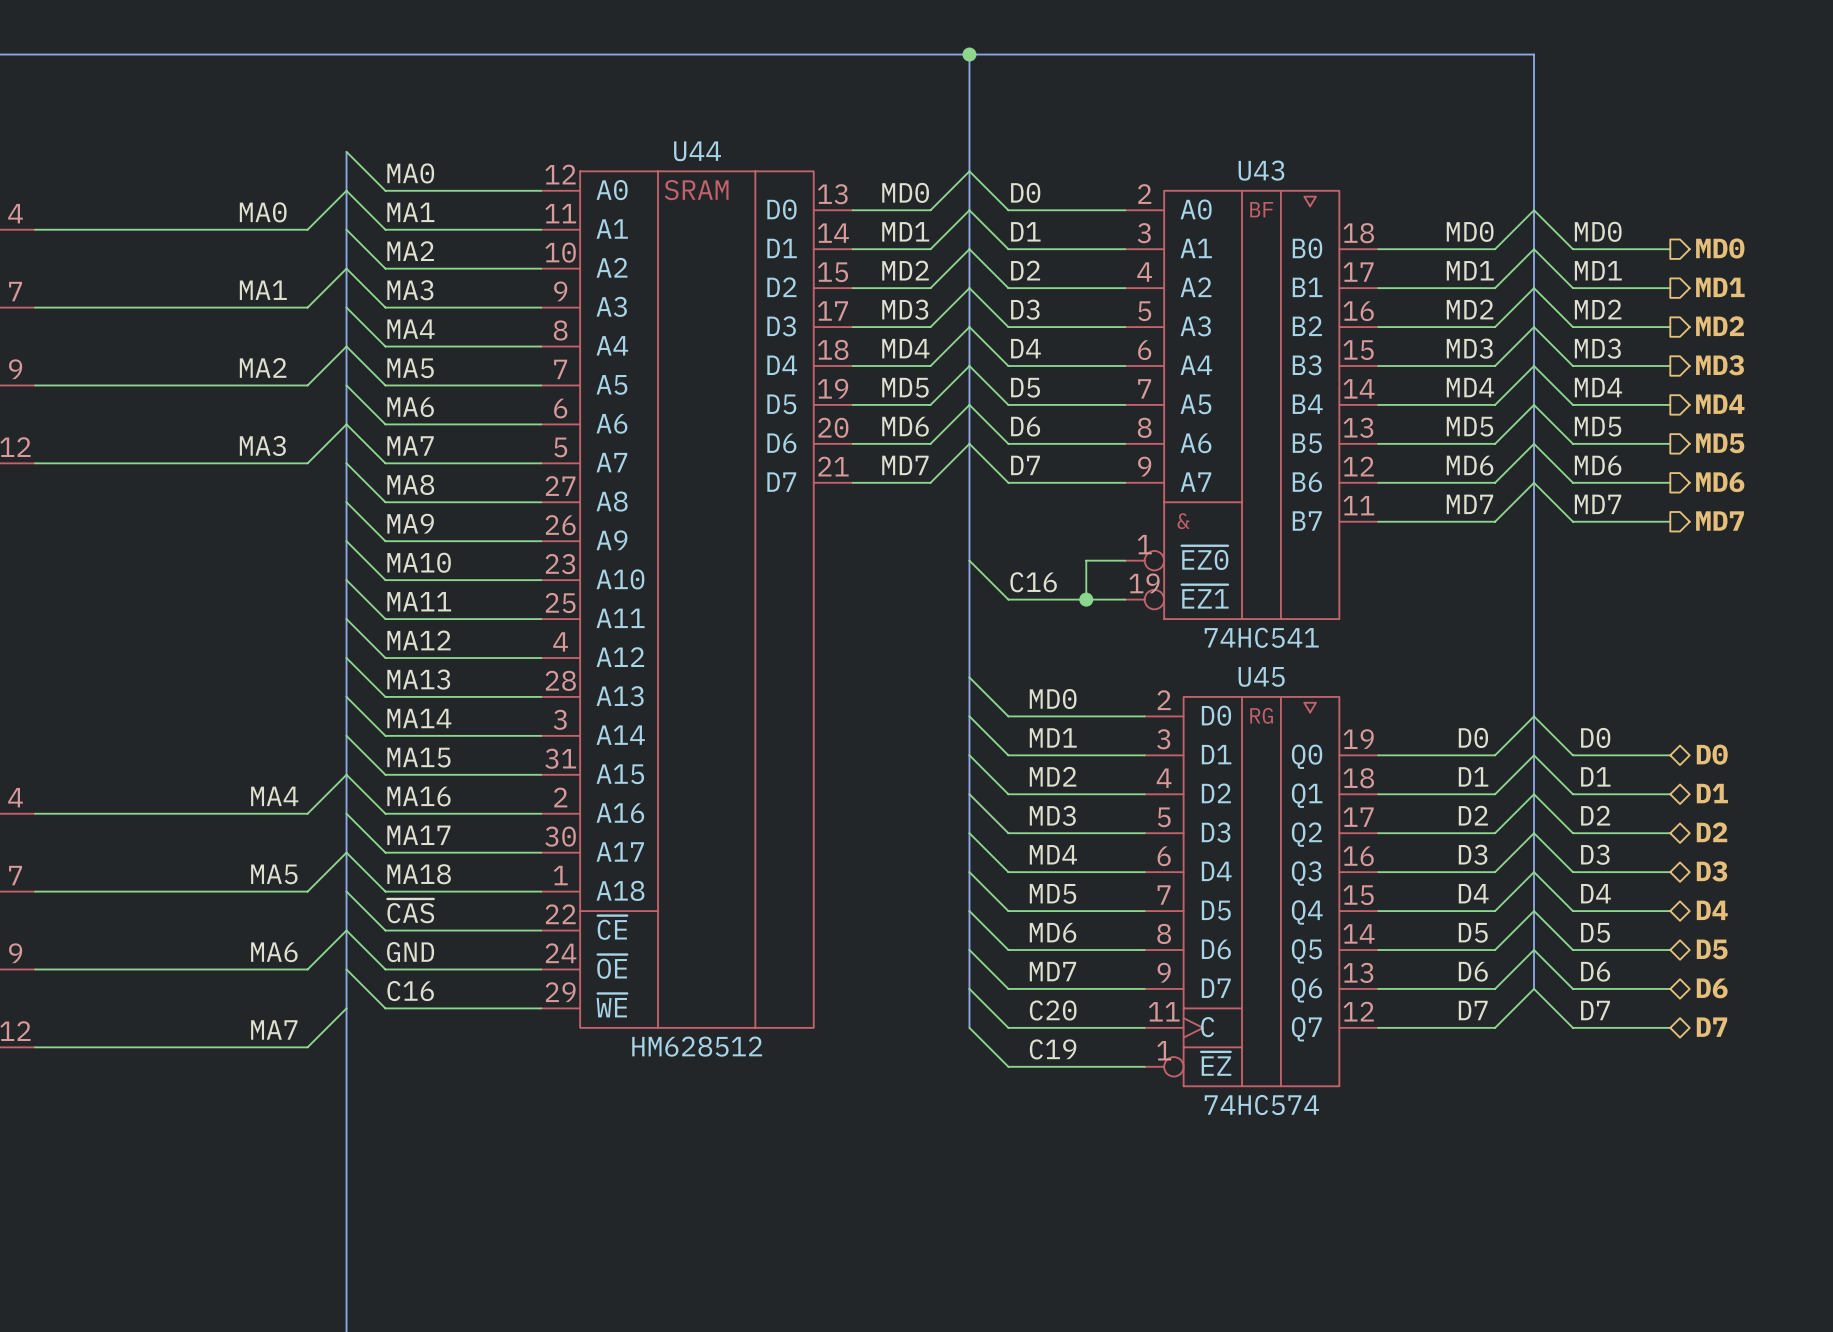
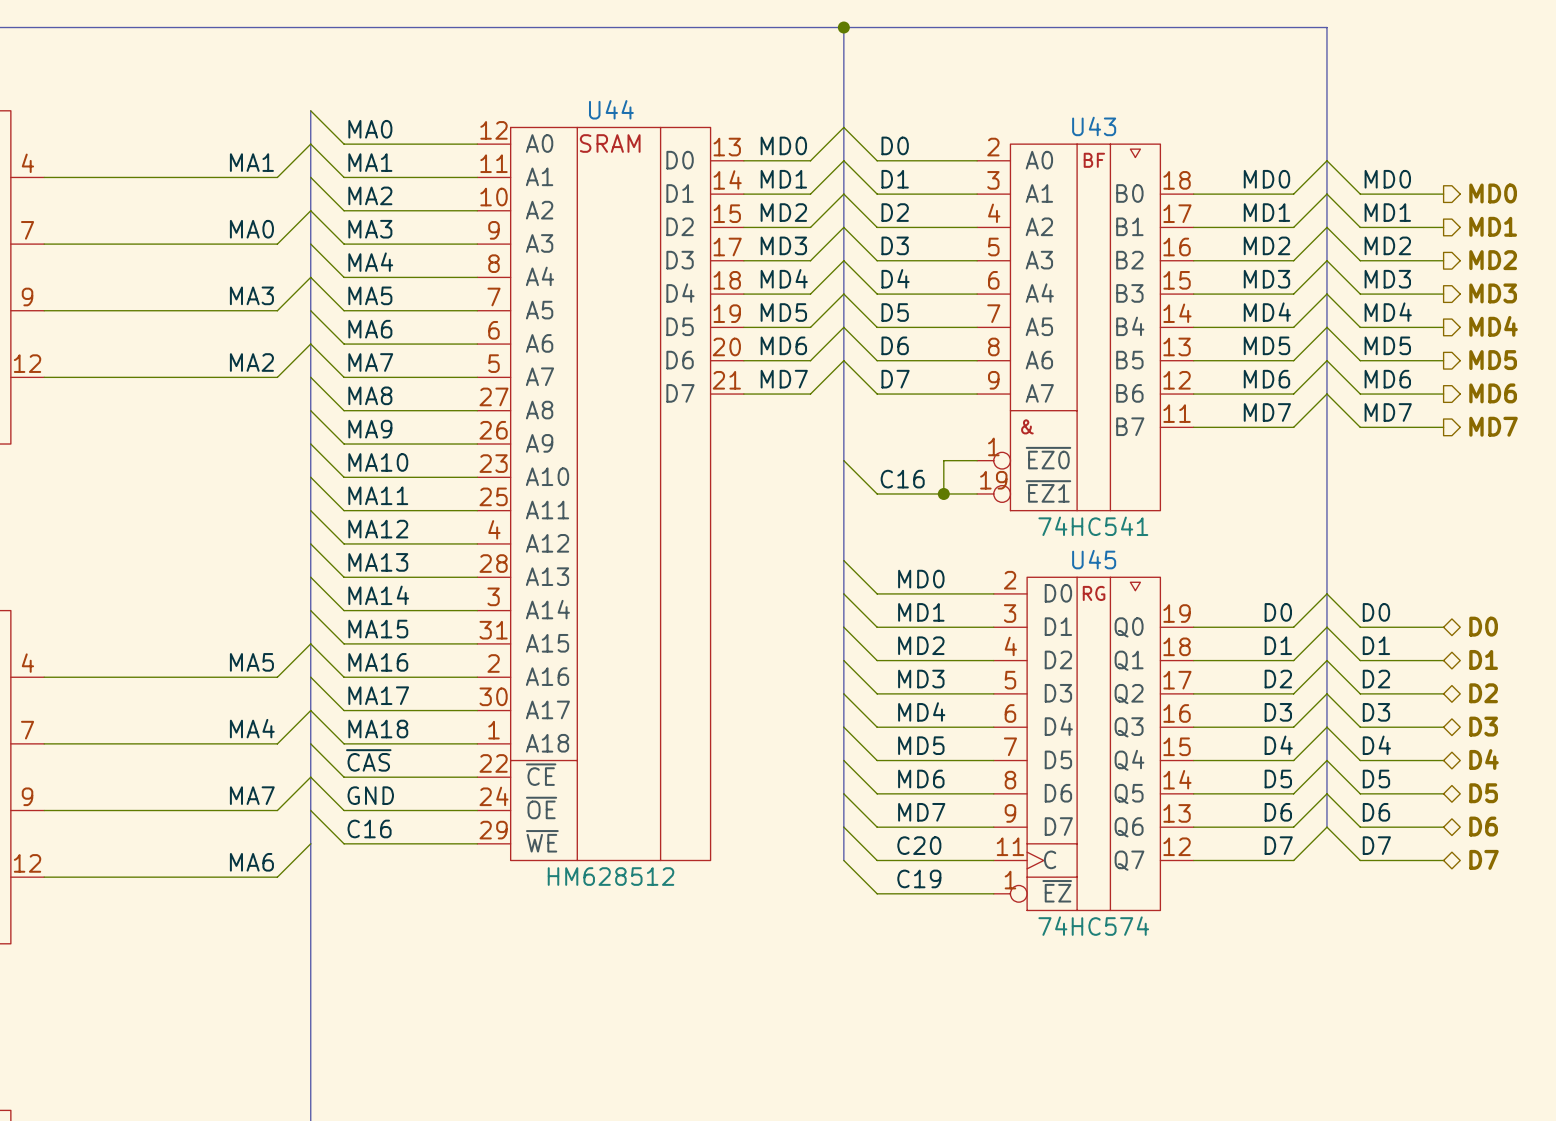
label position: MA0 (263, 212) -> MA0 (251, 229)
label position: MA1 (263, 290) -> MA1 (251, 162)
label position: MA2 (263, 367) -> MA2 (251, 362)
label position: MA3 (262, 445) -> MA3 (251, 295)
label position: MA4 (274, 796) -> MA4 (252, 728)
label position: MA5 (274, 874) -> MA5 (251, 662)
label position: MA6 (274, 952) -> MA6 (251, 862)
label position: MA7 (274, 1029) -> MA7 (252, 795)

